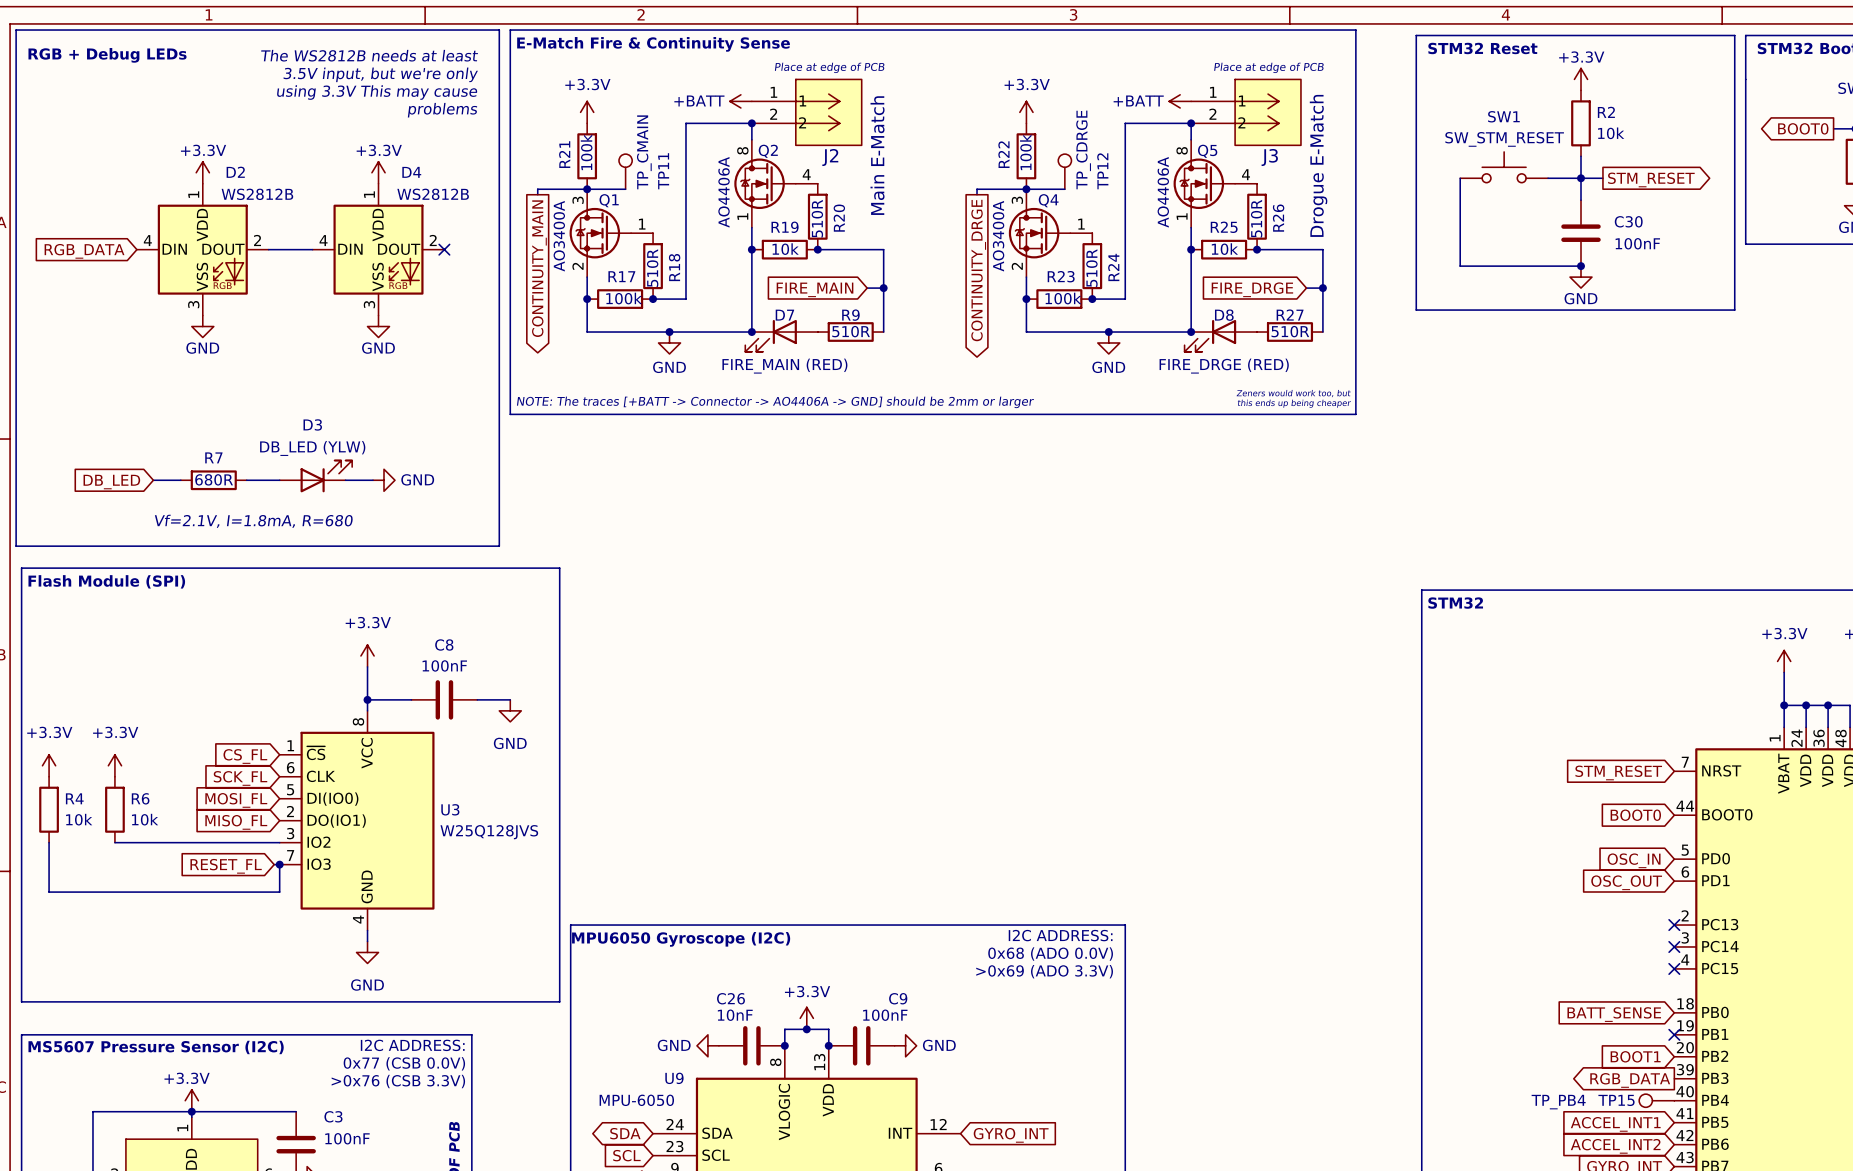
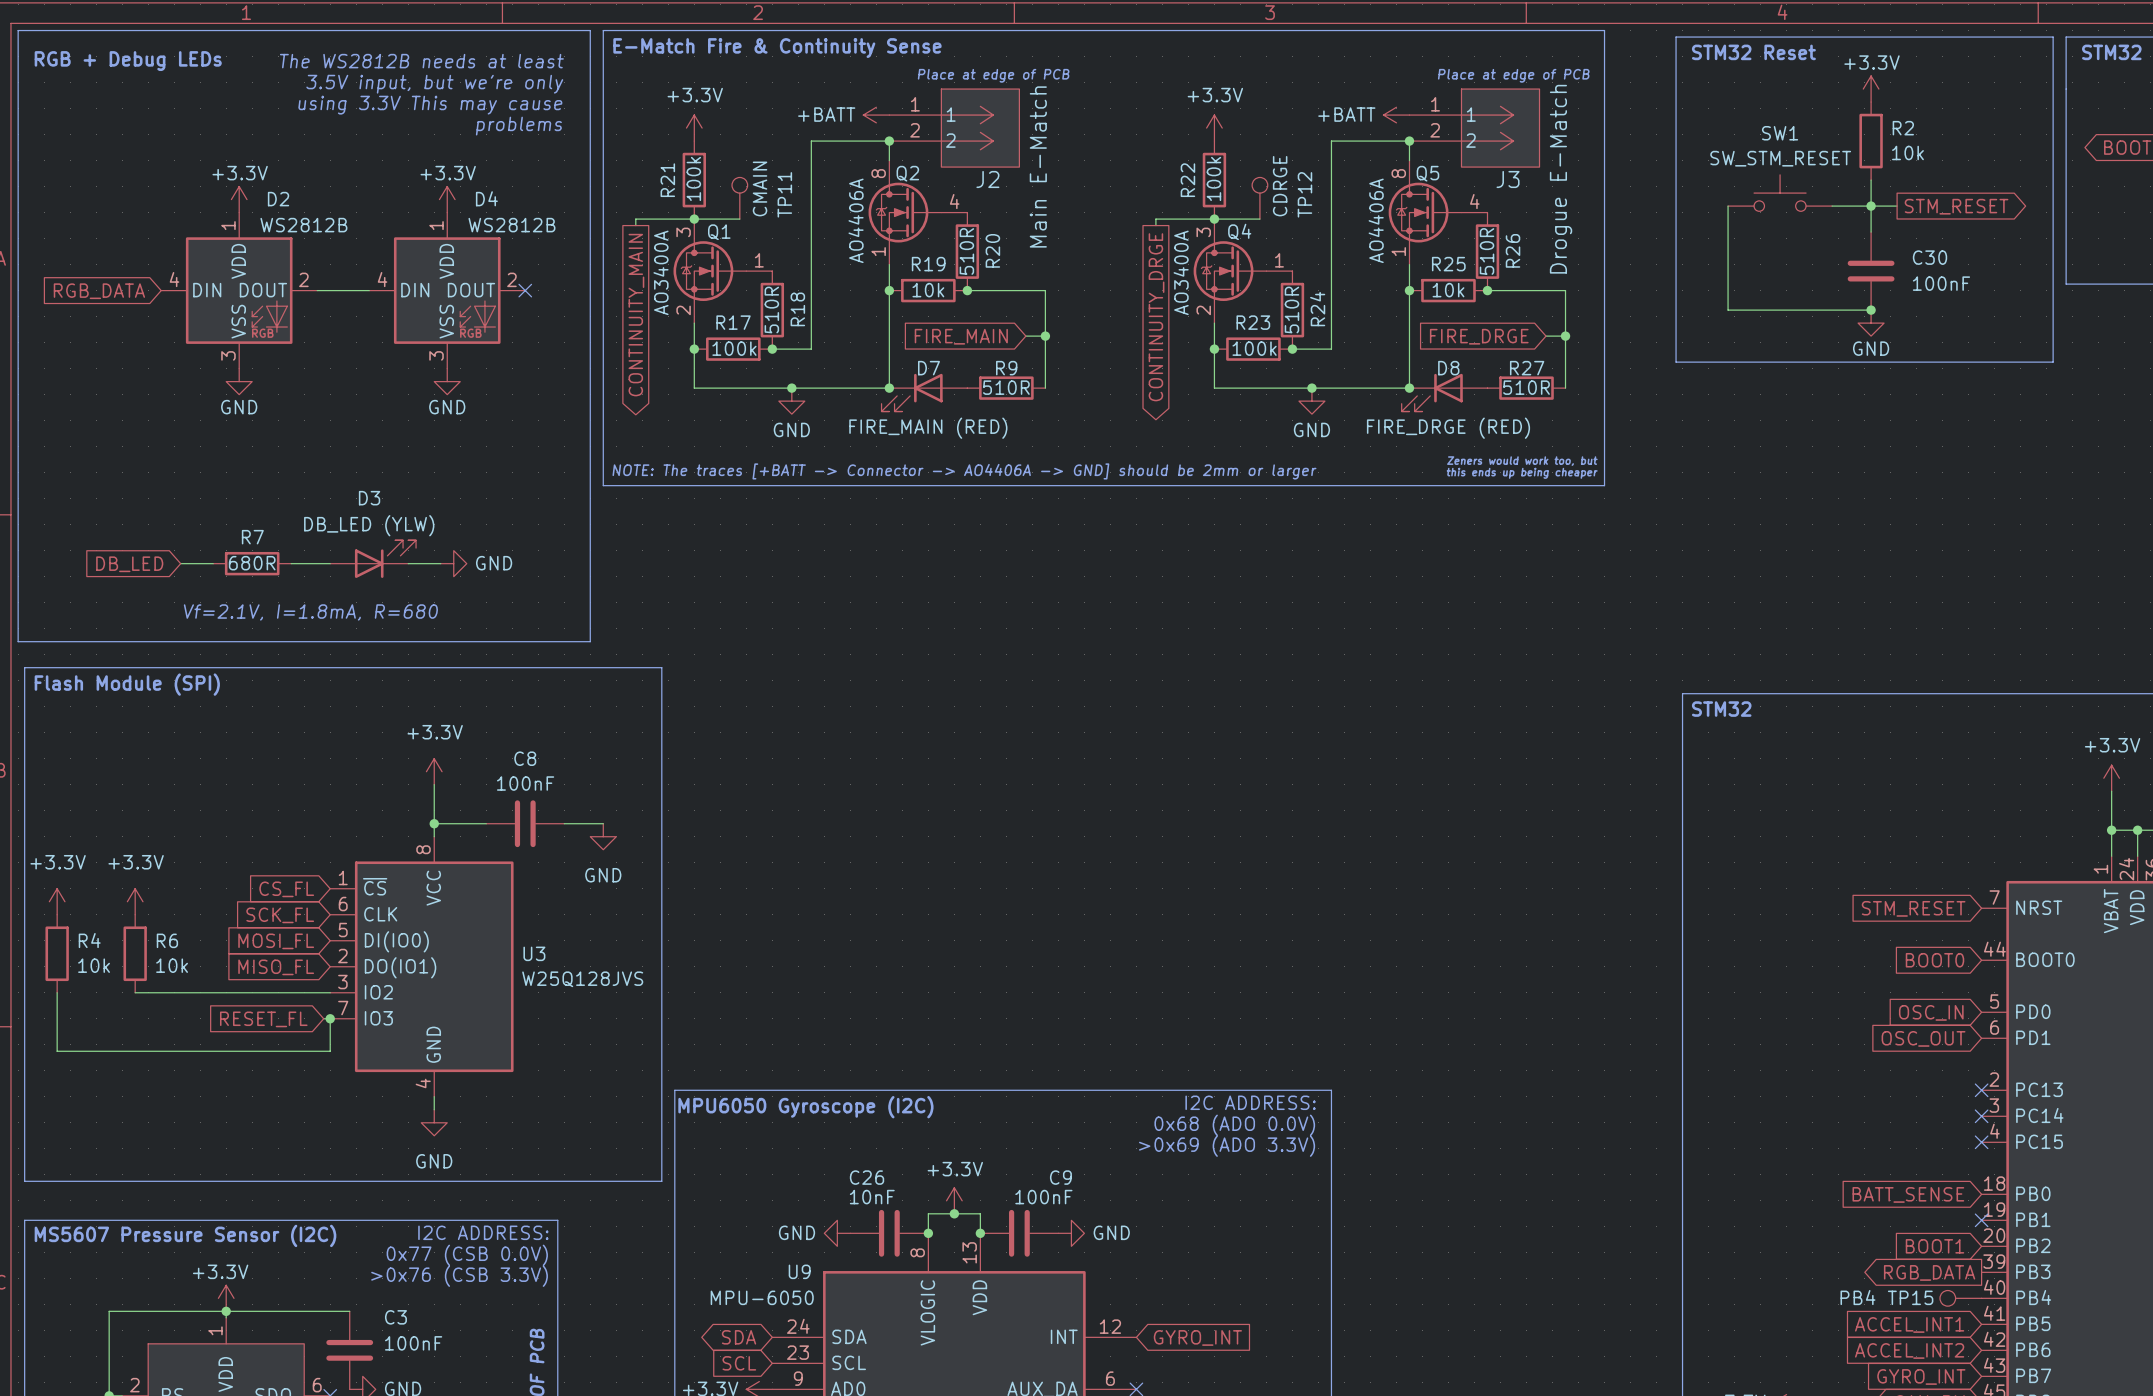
TP12 value: TP_CDRGE (1083, 149) -> CDRGE (1280, 186)
TP11 value: TP_CMAIN (644, 152) -> CMAIN (760, 188)
TP15 value: TP_PB4 (1558, 1102) -> PB4 (1857, 1297)

